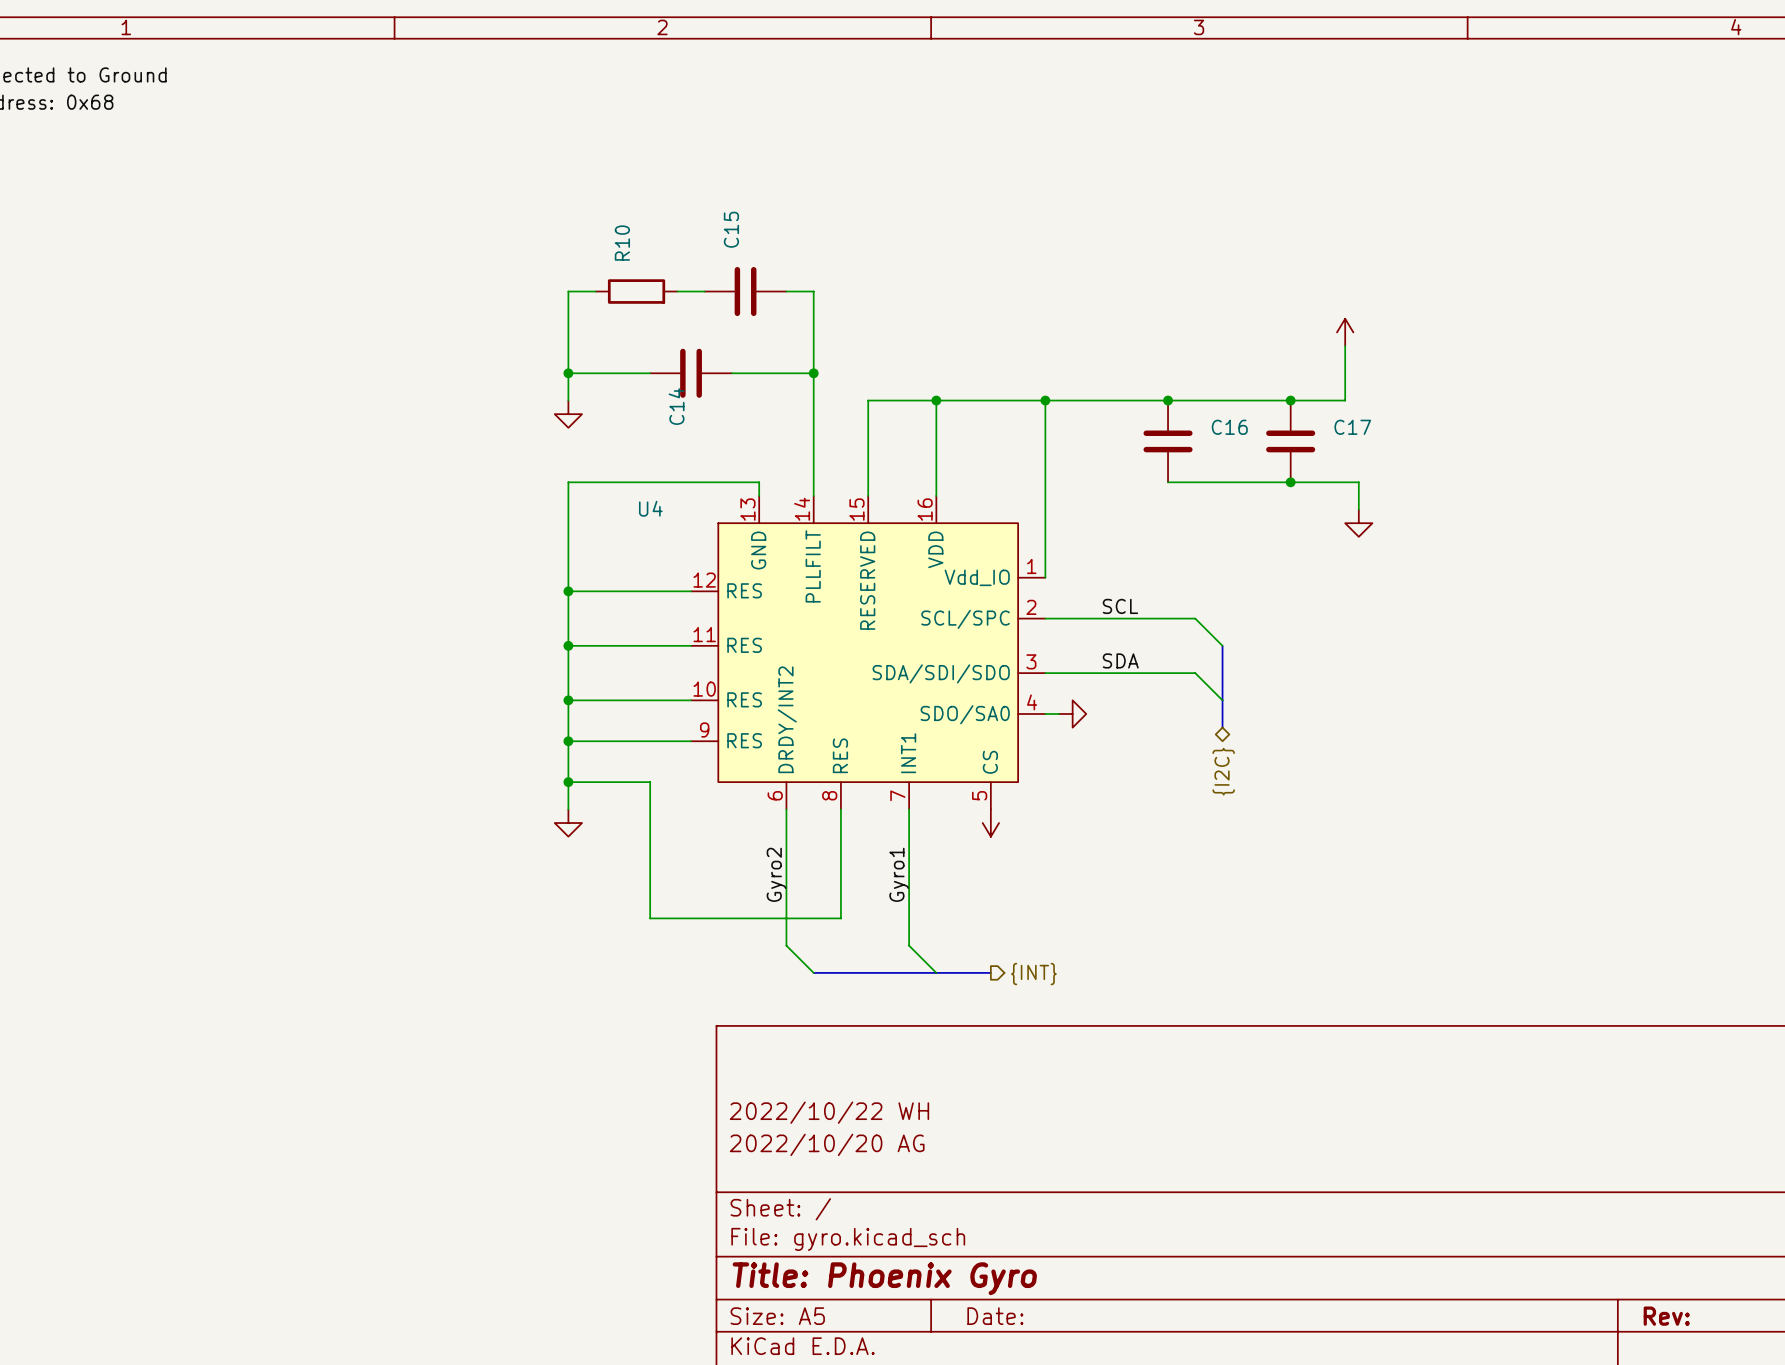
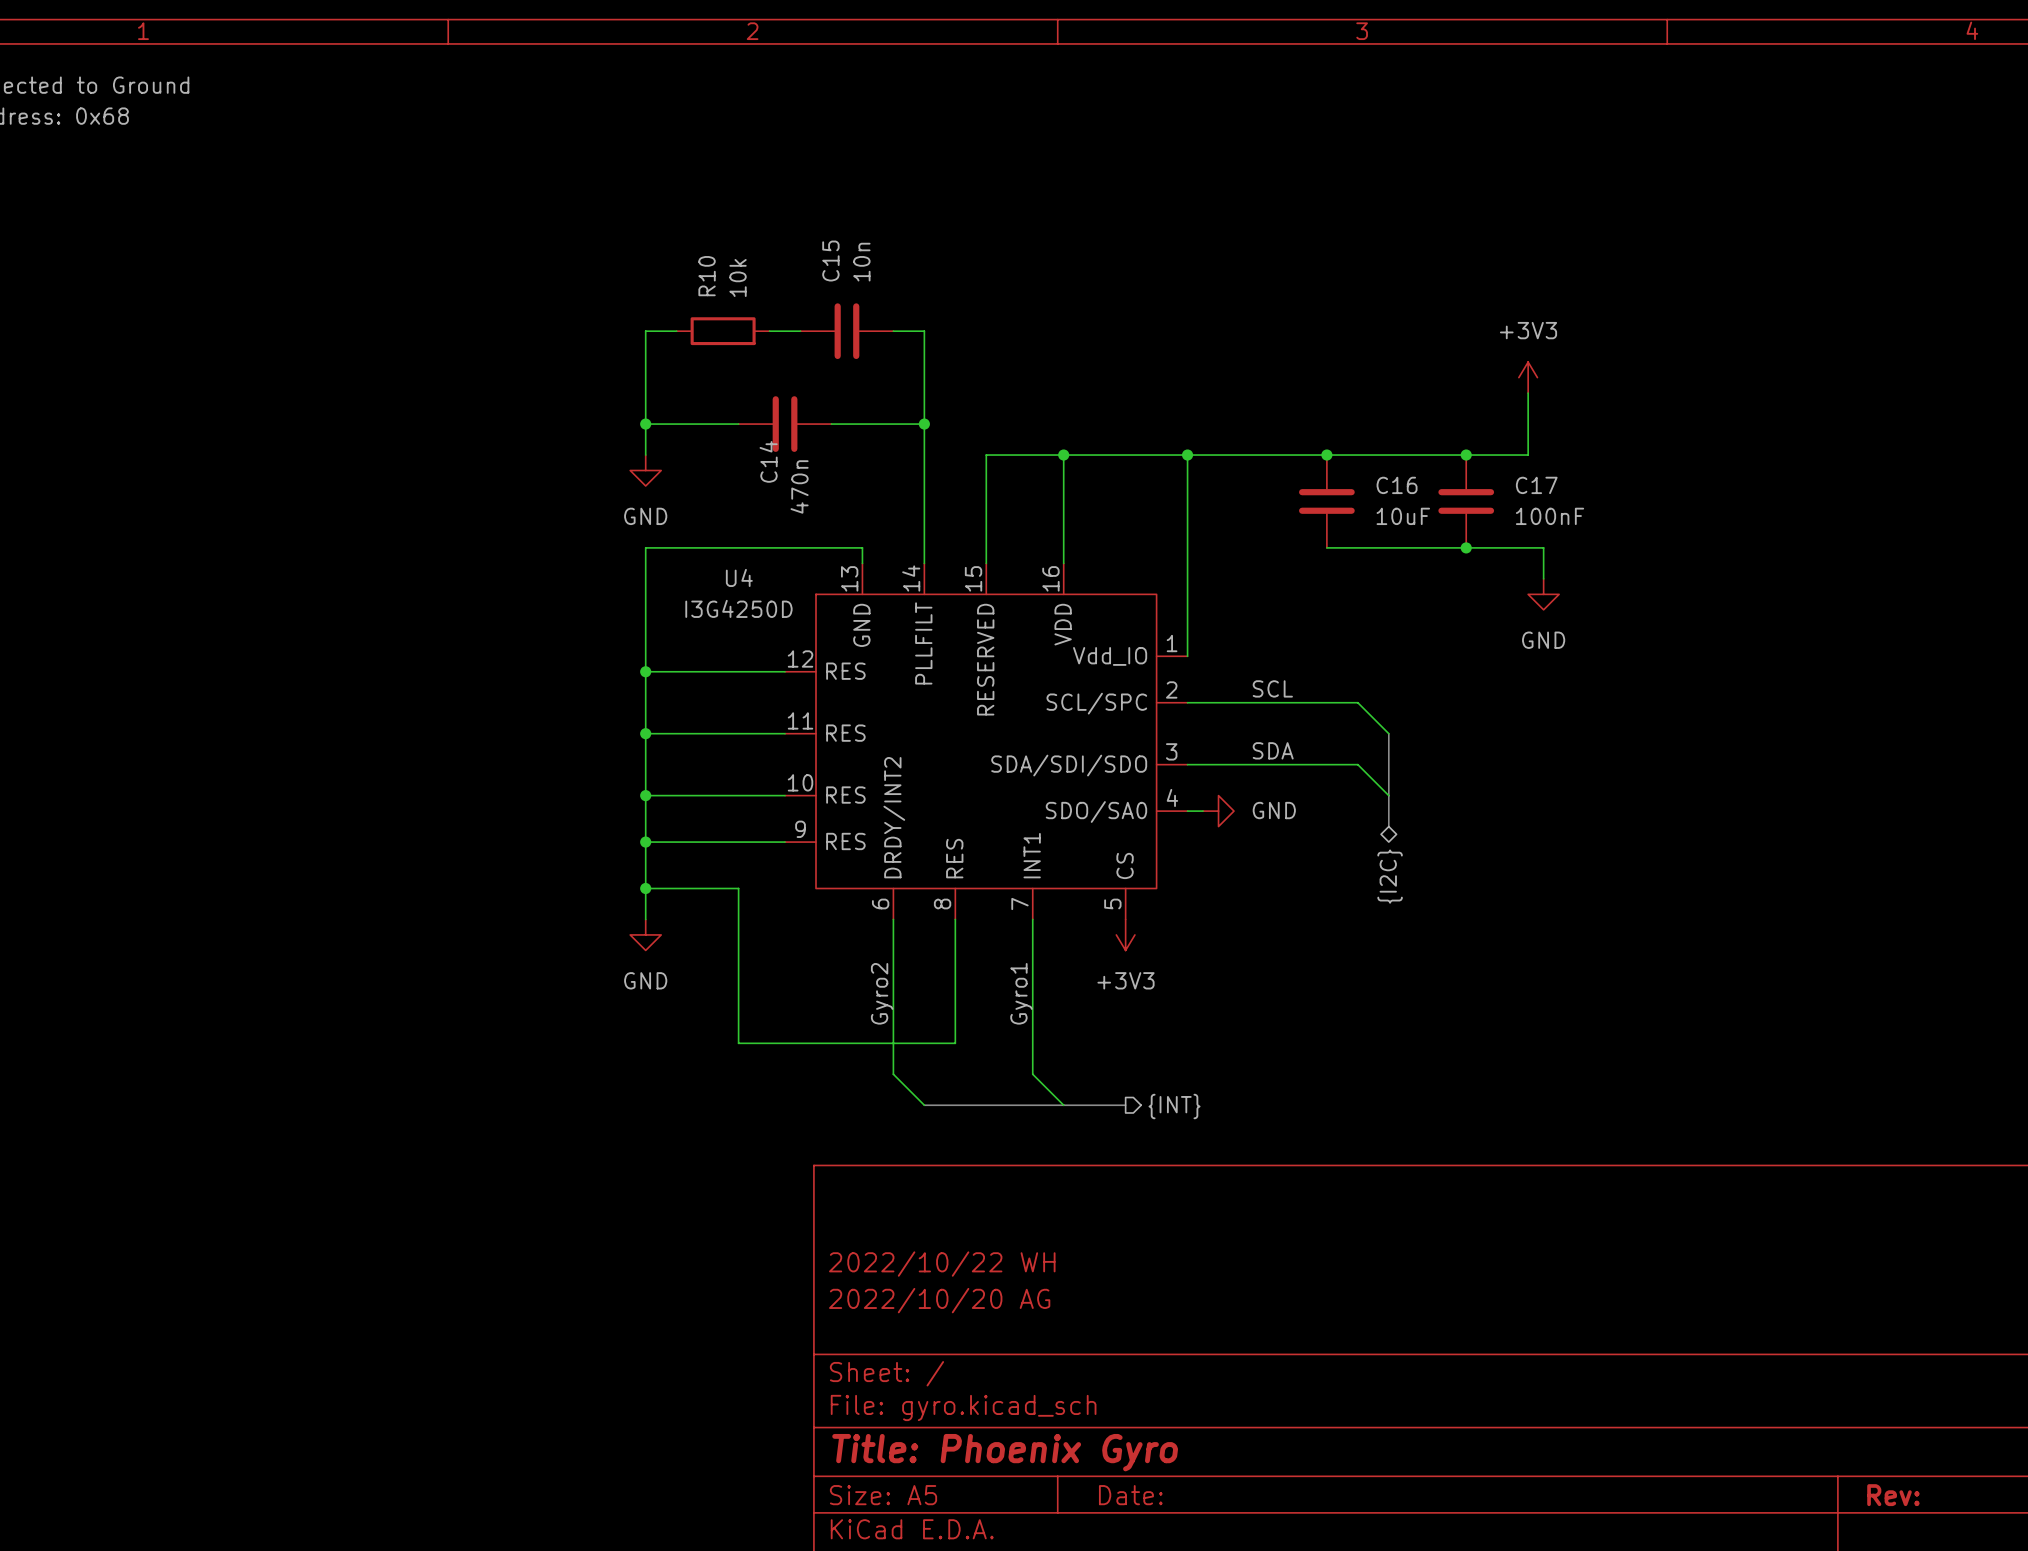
C15 value: none -> 10n (861, 262)
R10 value: none -> 10k (738, 277)
power symbol text: none -> +3V3 (1528, 330)
C14 value: none -> 470n (799, 486)
power symbol text: none -> GND (645, 516)
C16 value: none -> 10uF (1403, 516)
C17 value: none -> 100nF (1550, 516)
U4 value: none -> I3G4250D (738, 608)
power symbol text: none -> GND (1543, 640)
power symbol text: none -> GND (1274, 810)
power symbol text: none -> GND (645, 980)
power symbol text: none -> +3V3 (1126, 980)

